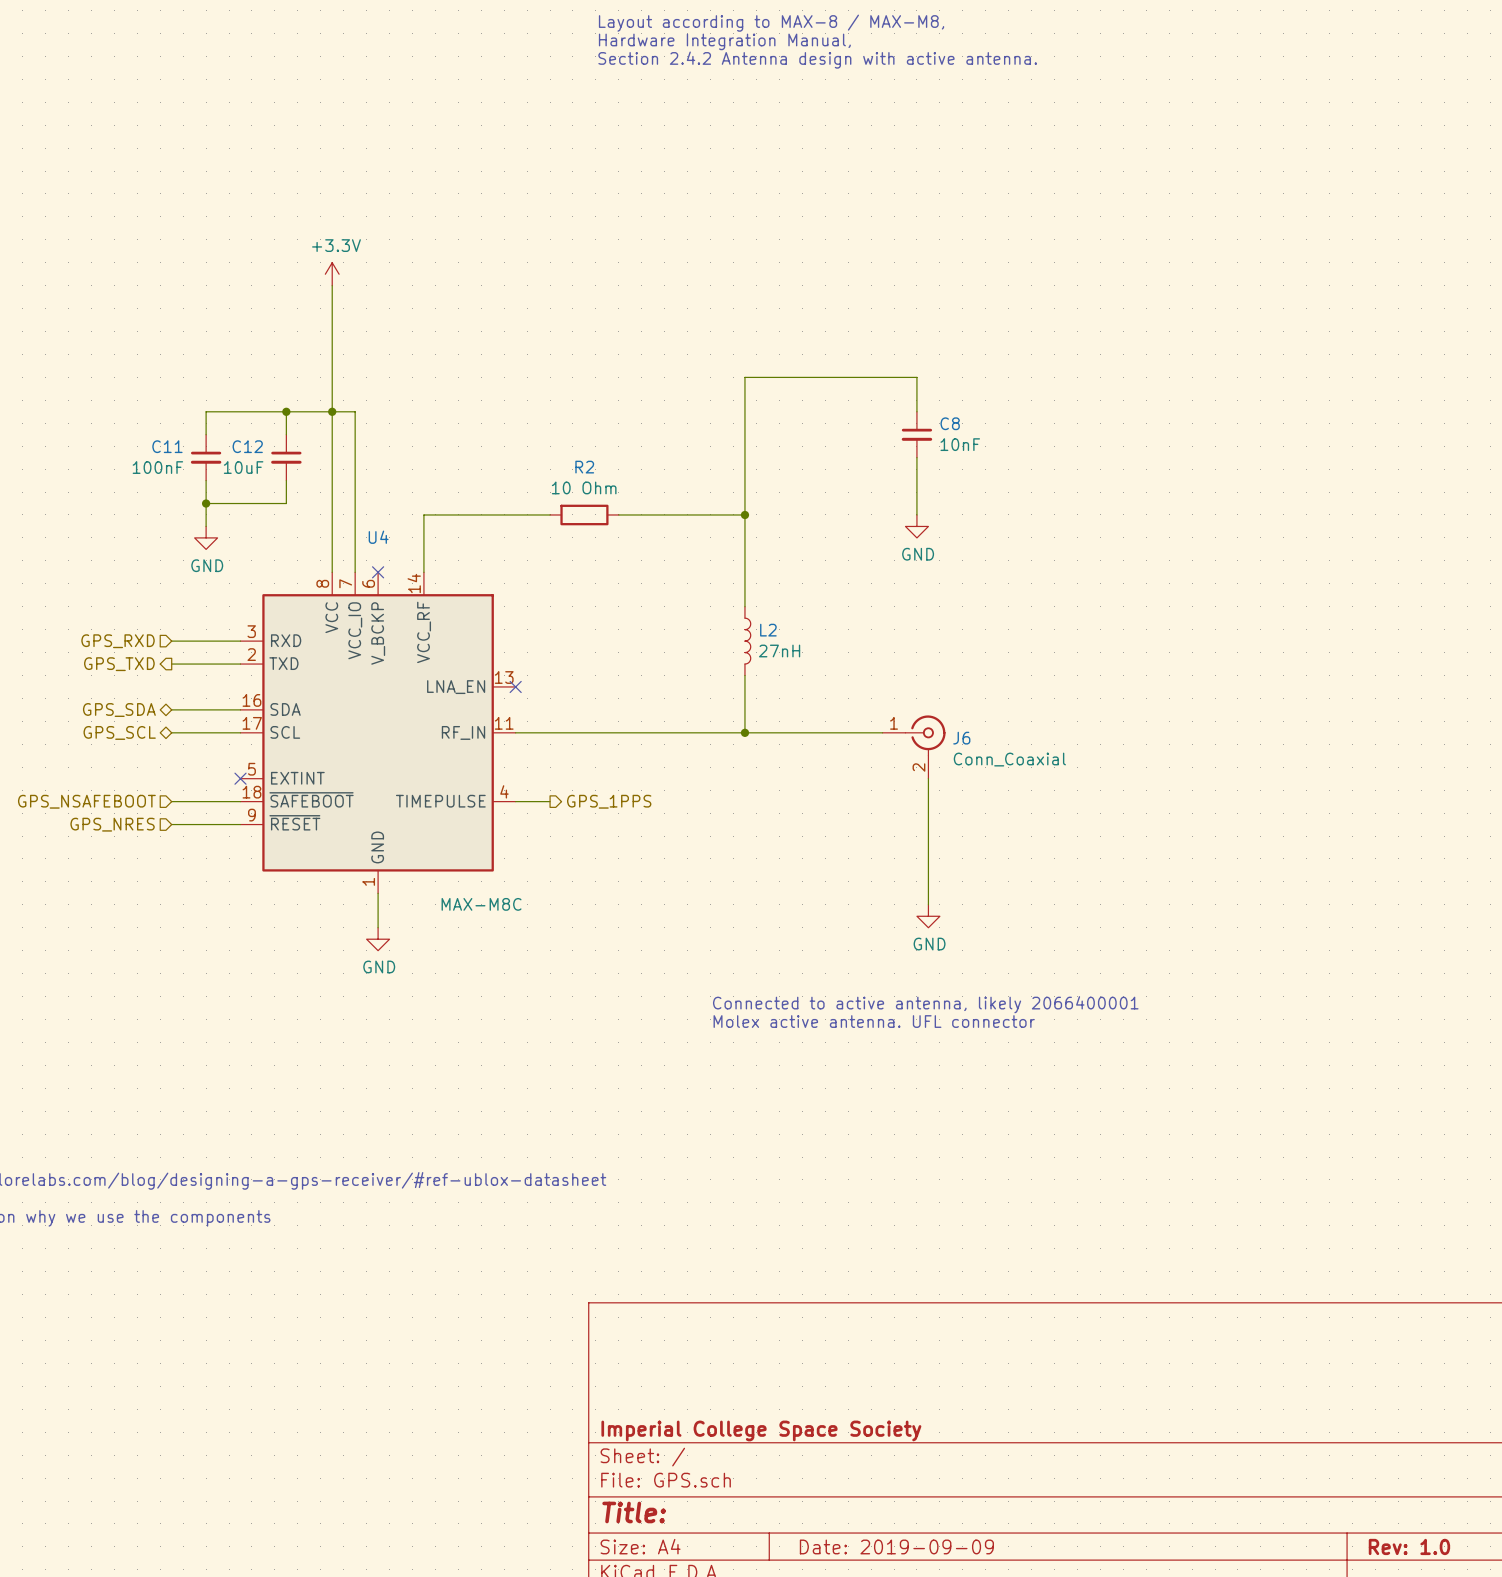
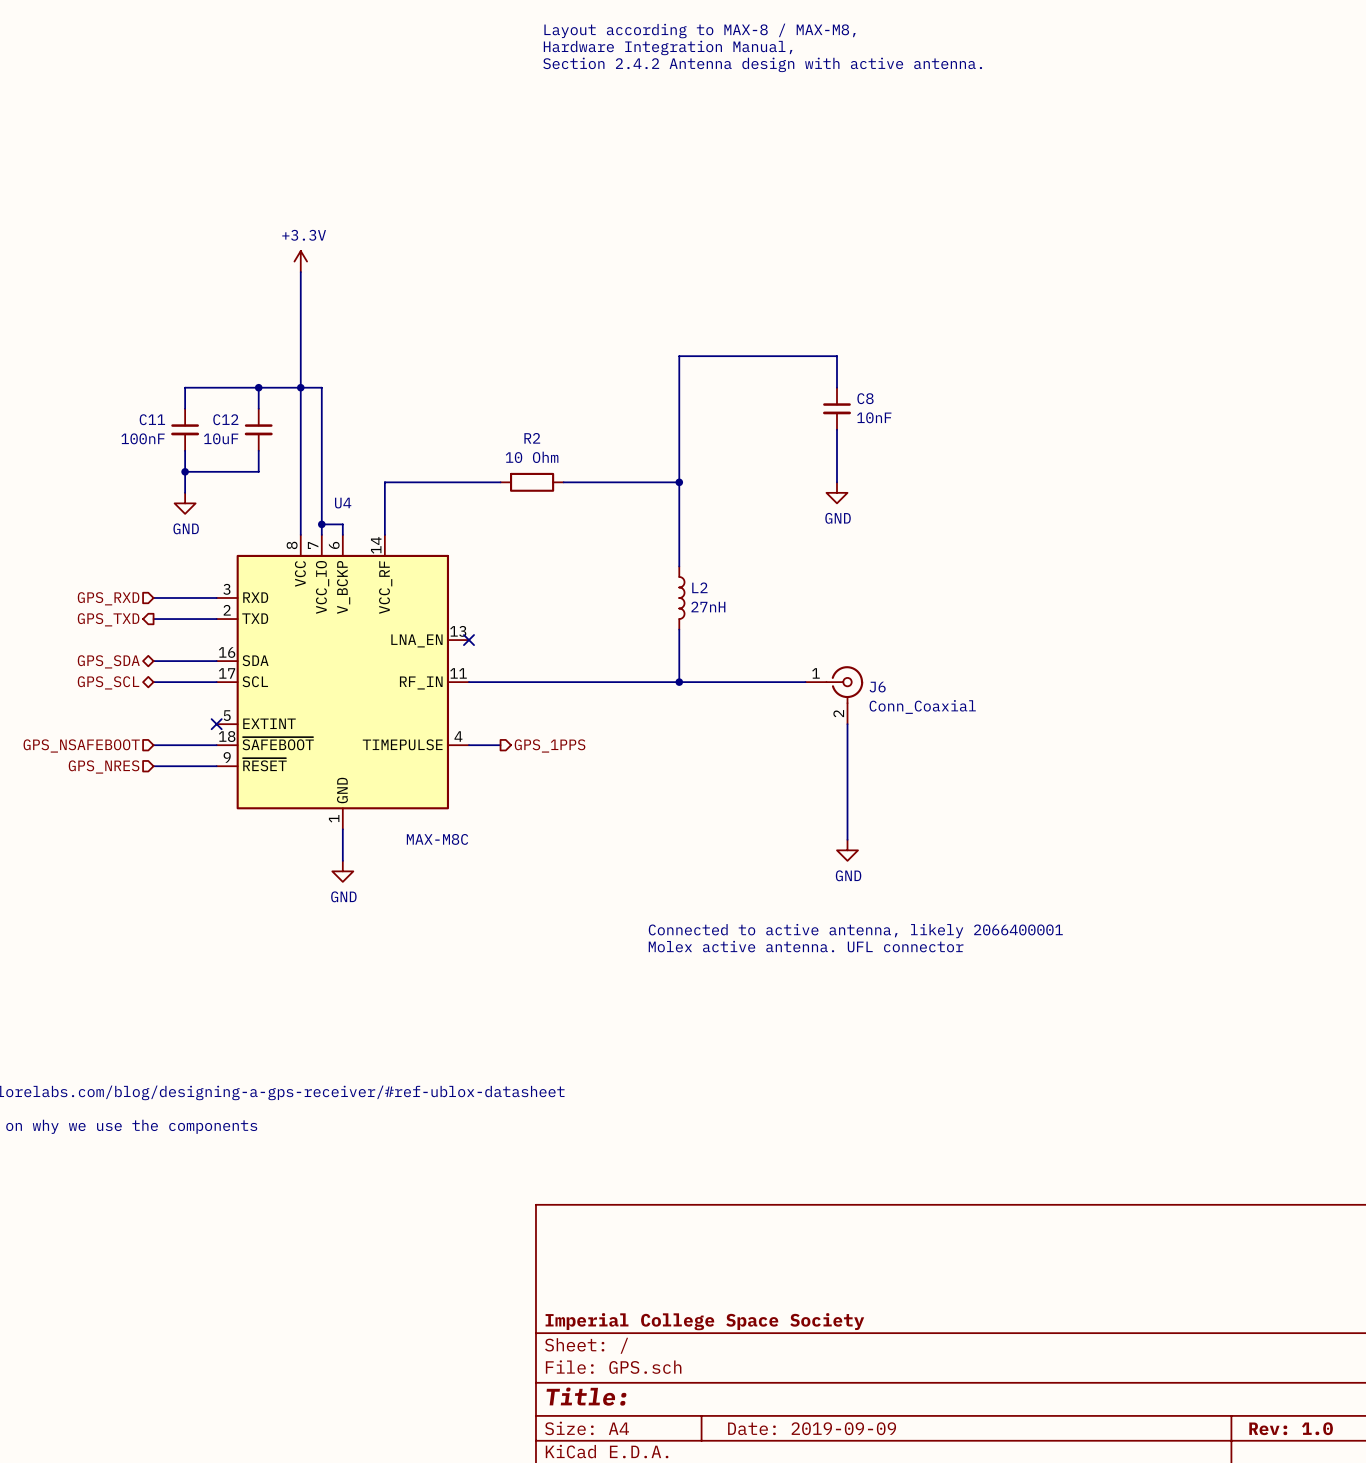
wire: none -> (321, 524) (342, 524) (342, 534)
junction: none -> (321, 524)
no-connect mark: (378, 572) -> none

